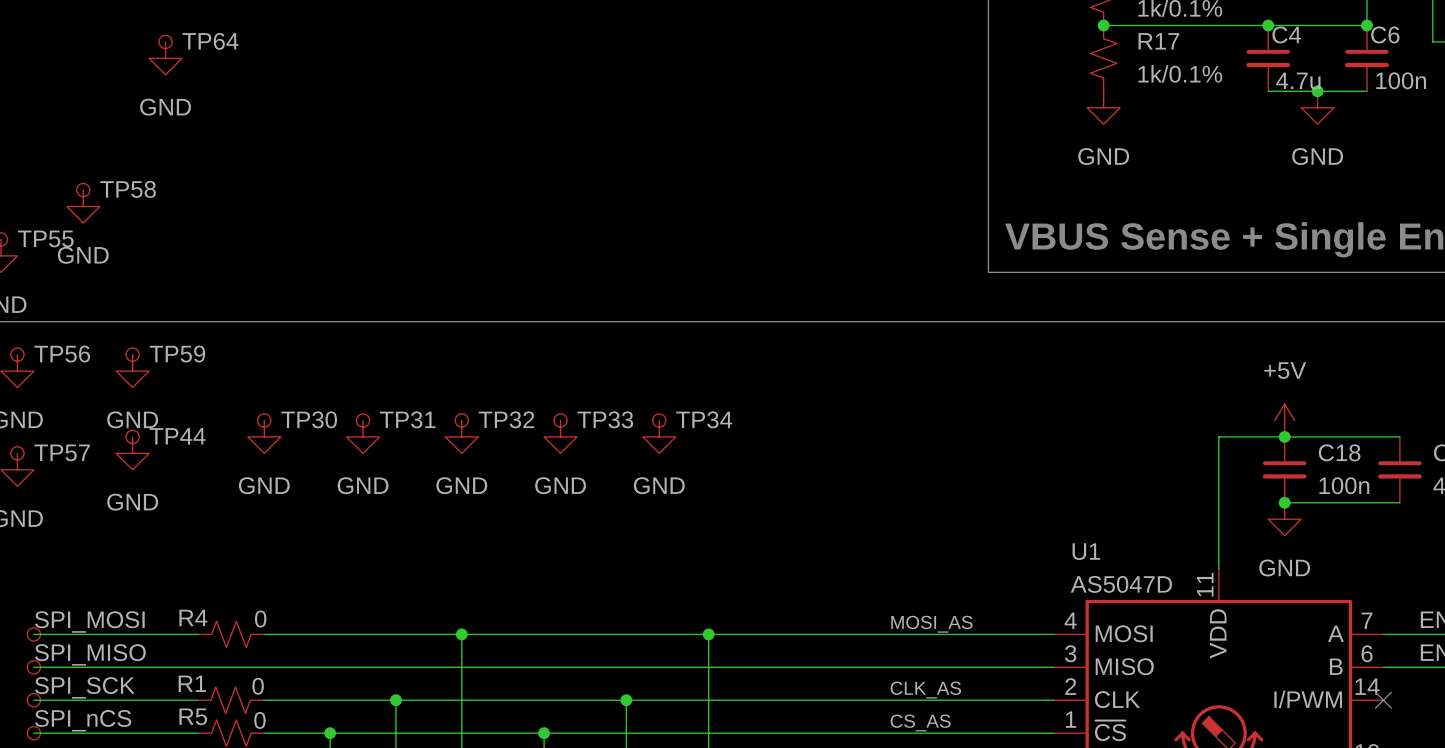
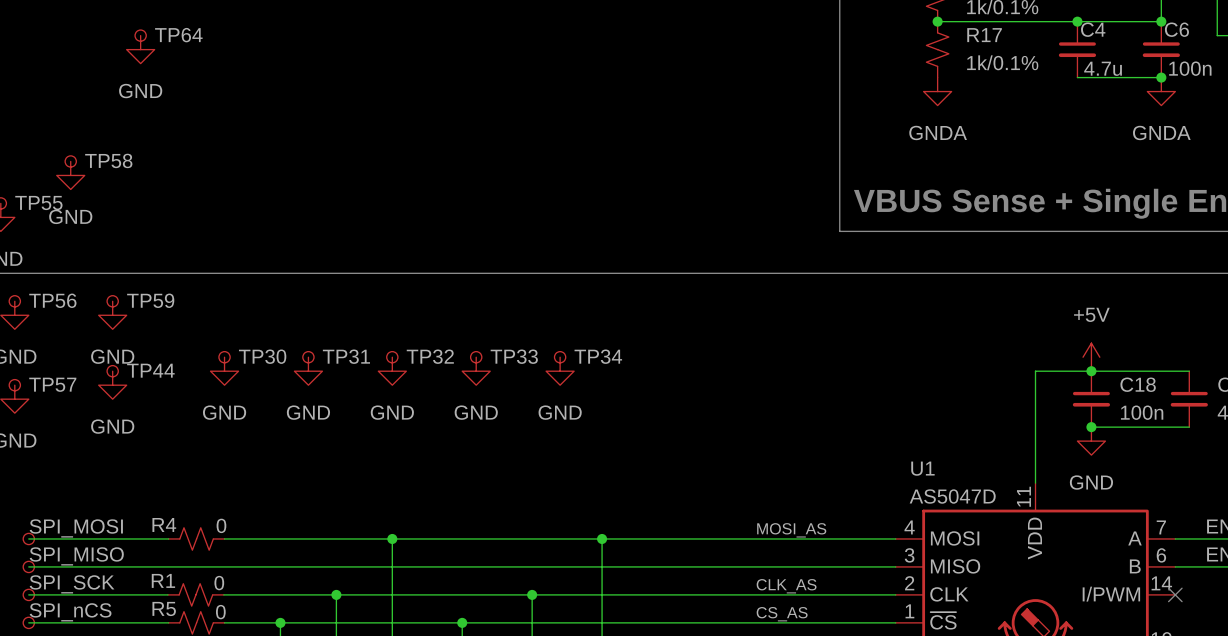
junction position: (1317, 91) -> (1161, 77)
power symbol: GND (1103, 107) -> GNDA (937, 91)
power symbol: GND (1317, 107) -> none
power symbol: none -> GNDA (1161, 91)

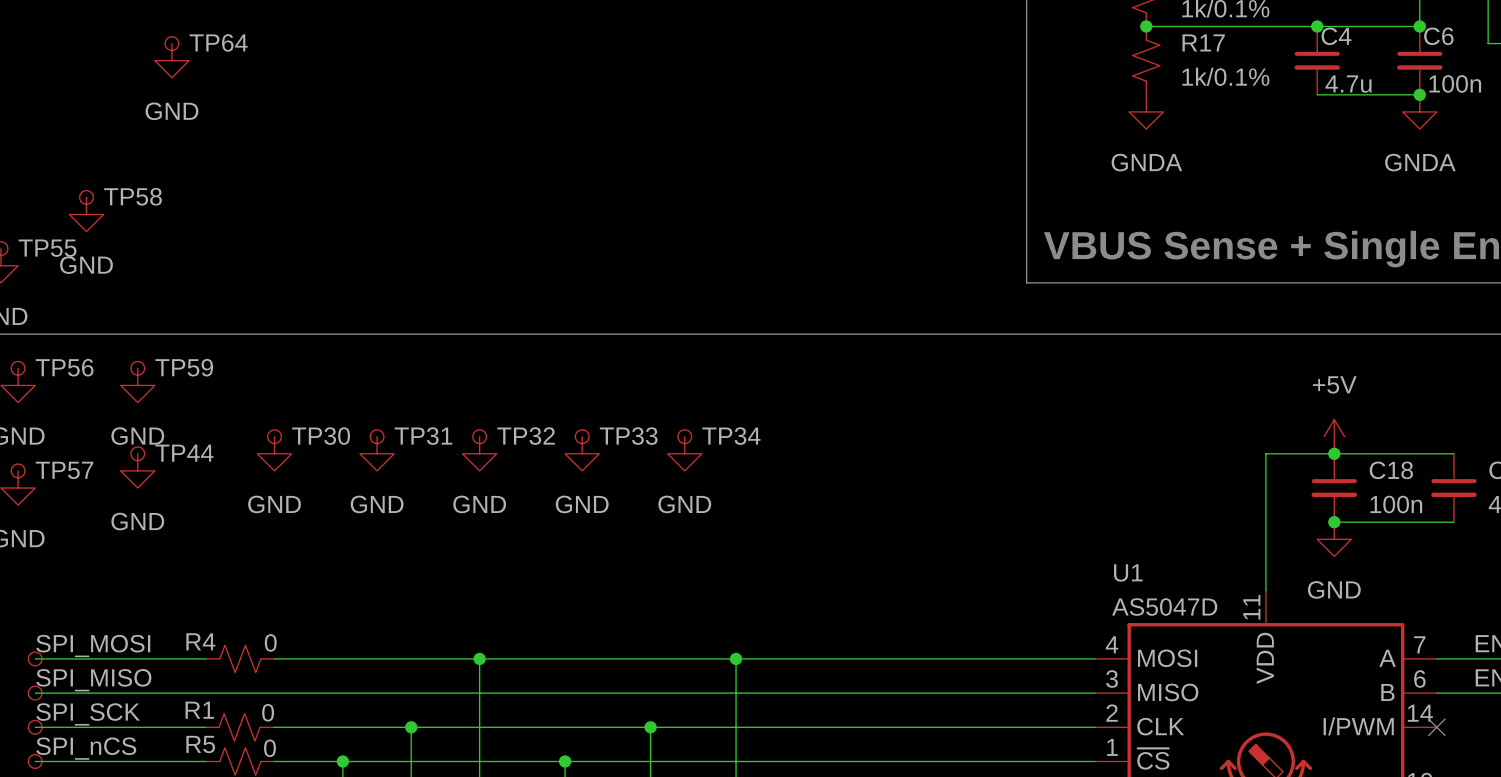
label: MOSI_AS (791, 530) -> none
label: CLK_AS (786, 586) -> none
label: CS_AS (782, 614) -> none

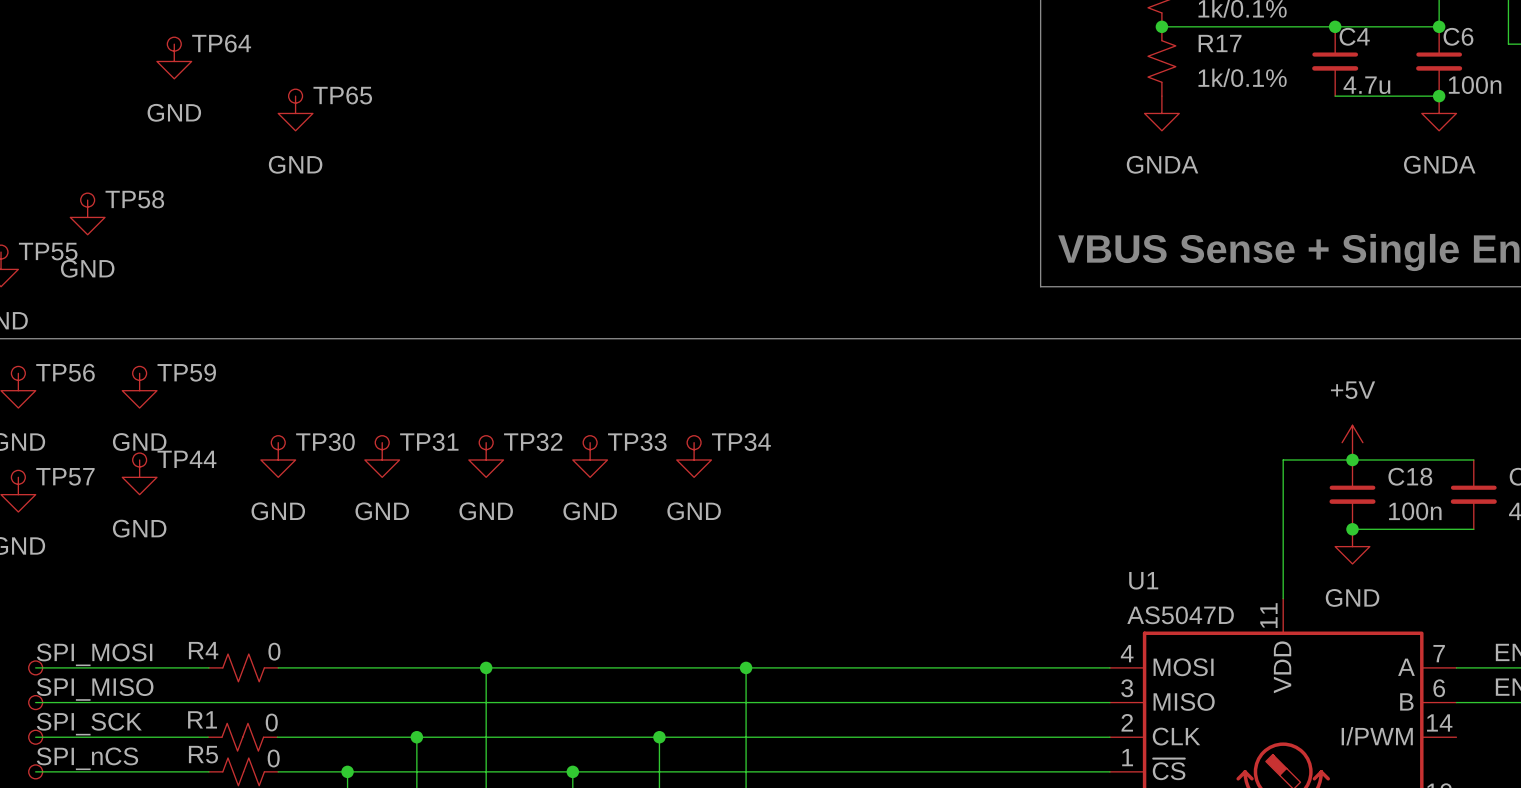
TP65: none -> (295, 96)
power symbol: none -> GND (295, 113)
no-connect mark: (1436, 727) -> none

